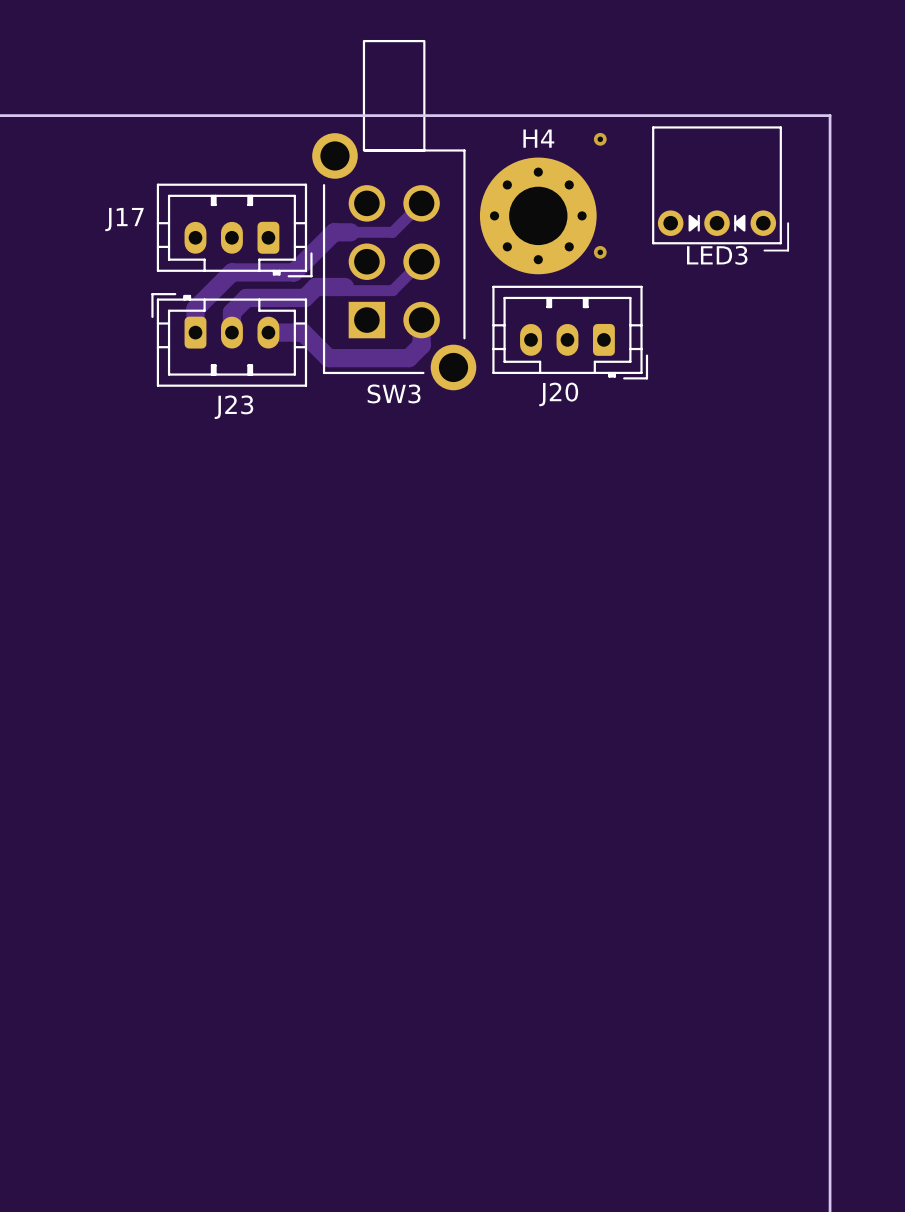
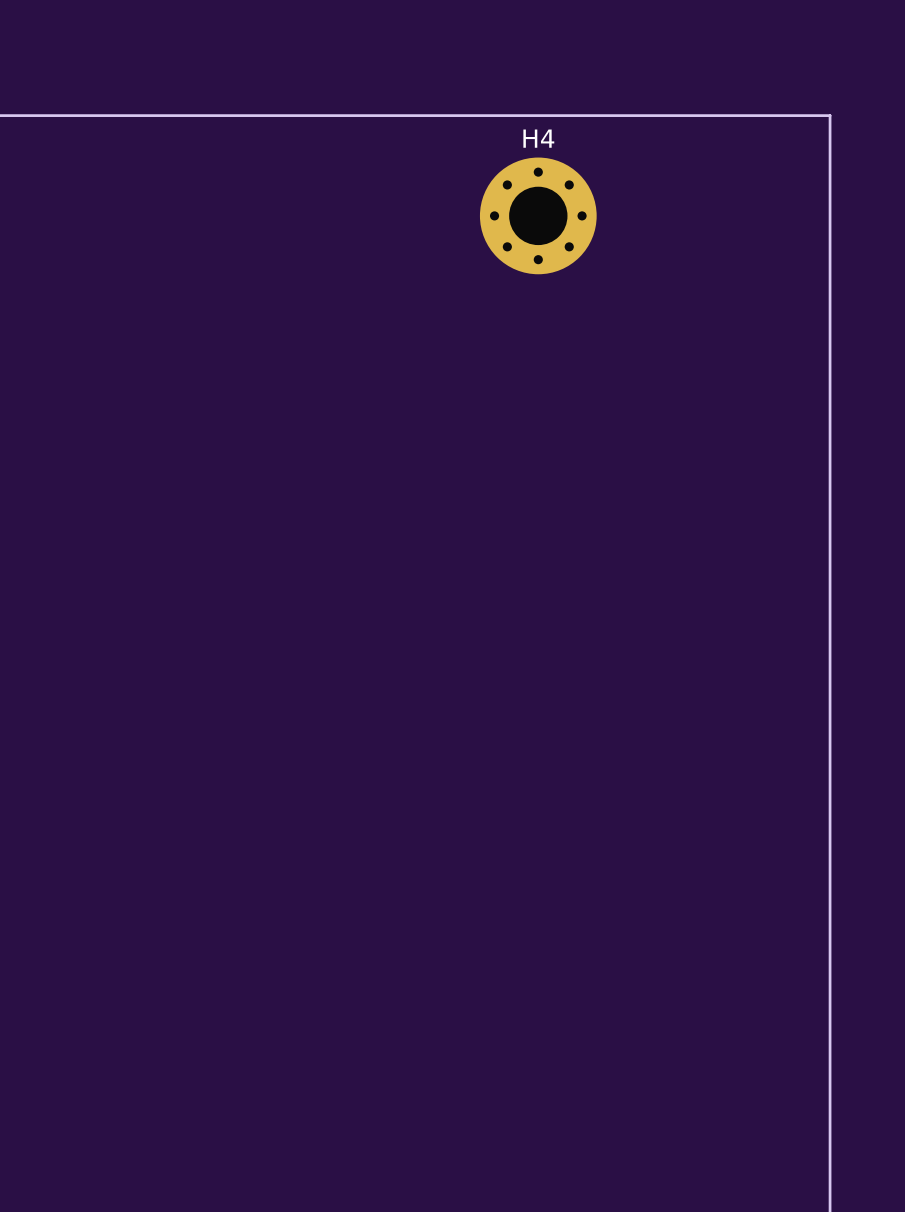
via: (600, 139) -> none
LED3: (720, 188) -> none
track: (421, 203) (392, 232) (334, 232) (293, 272) (231, 272) (195, 308) (195, 332) -> none
SW3: (394, 215) -> none
J17: (234, 230) -> none
via: (600, 252) -> none
track: (421, 261) (392, 290) (348, 290) (345, 287) (315, 287) (304, 297) (246, 297) (231, 312) (231, 332) -> none
track: (421, 320) (421, 345) (408, 358) (328, 358) (303, 332) (268, 332) -> none
J20: (570, 332) -> none
J23: (229, 339) -> none

